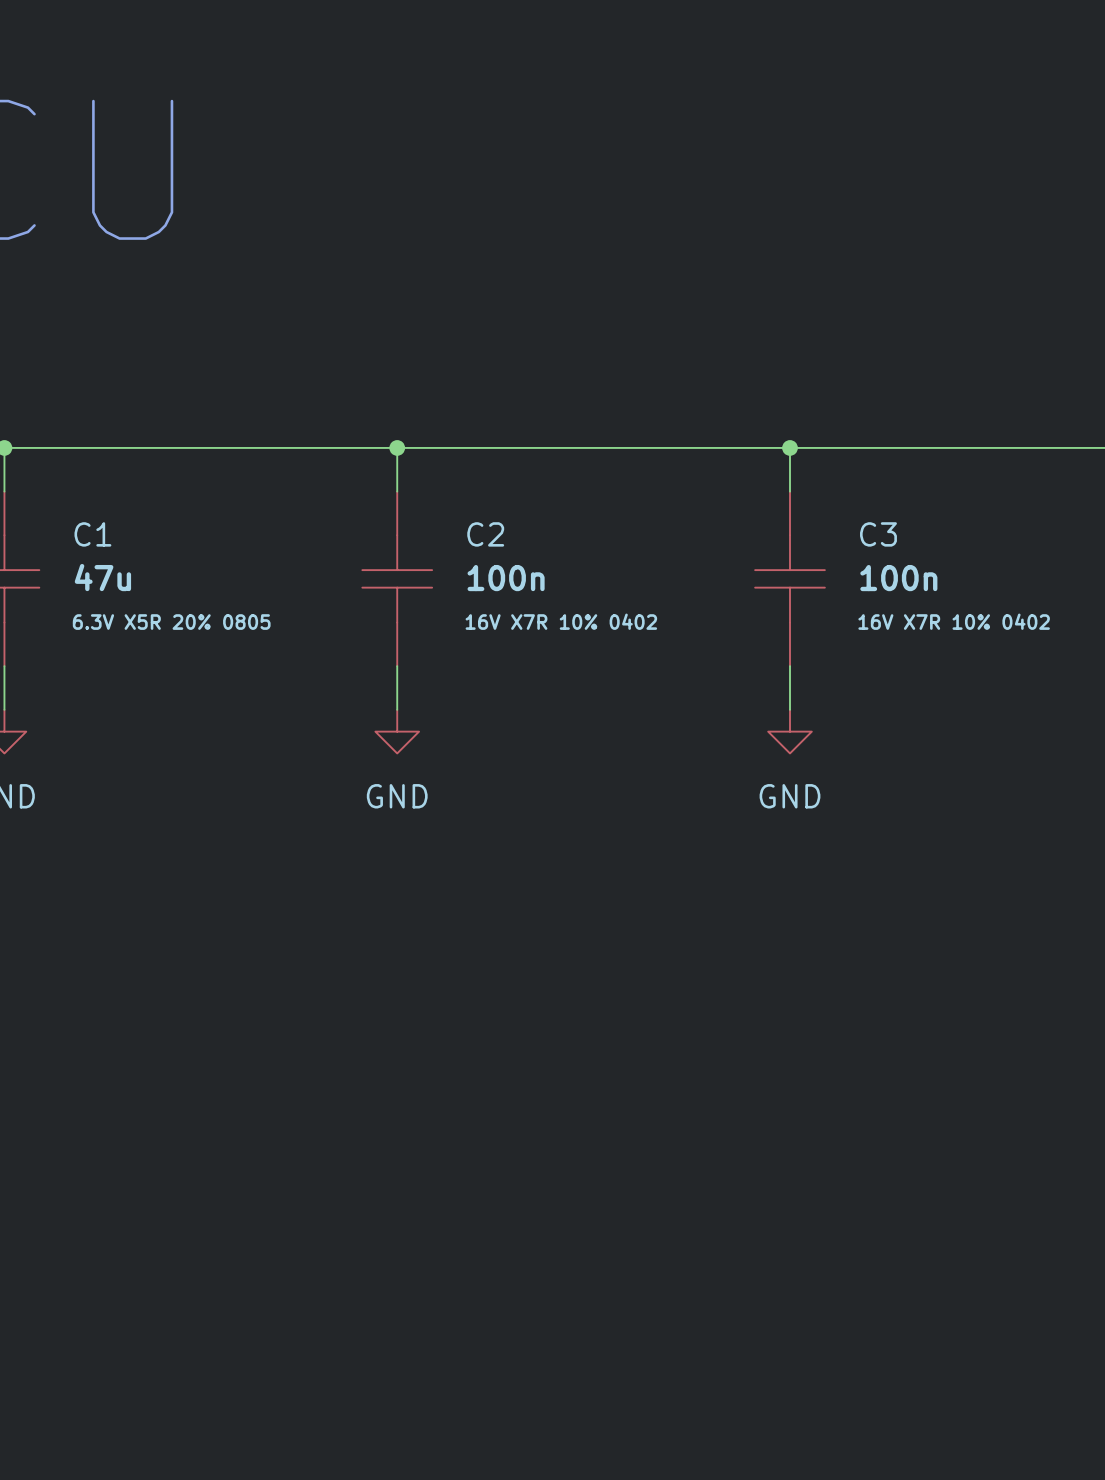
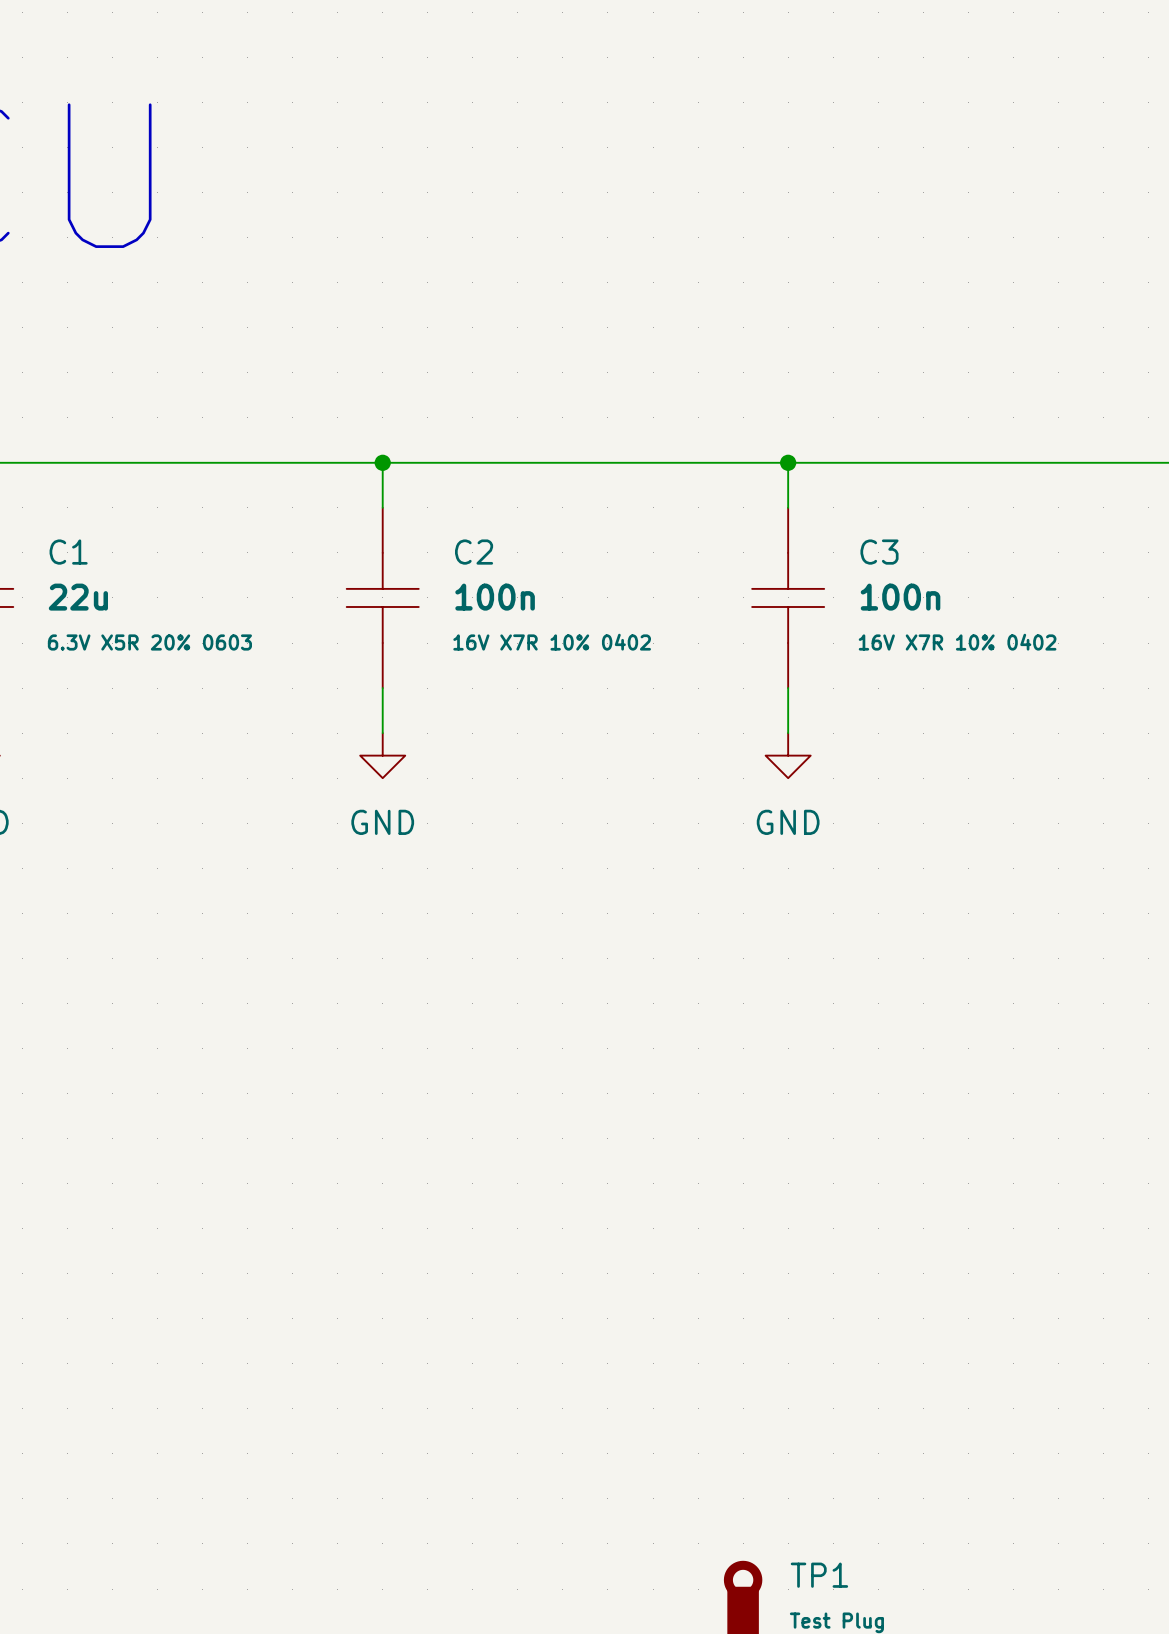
C1 value: 47u (102, 577) -> 22u (78, 597)
C1 text: 6.3V X5R 20% 0805 (171, 622) -> 6.3V X5R 20% 0603 (149, 642)

